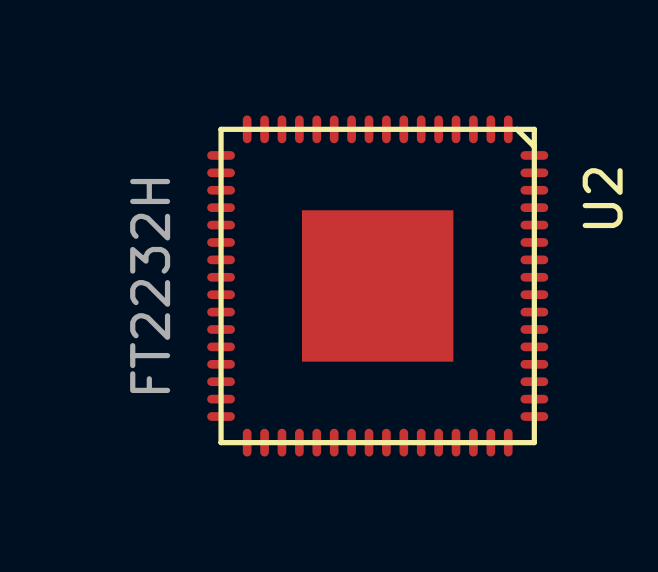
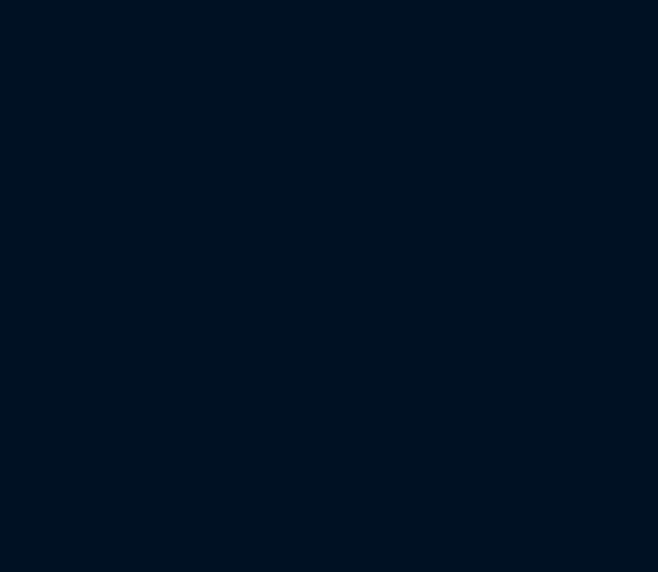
U2: FT2232H (377, 285) -> none

